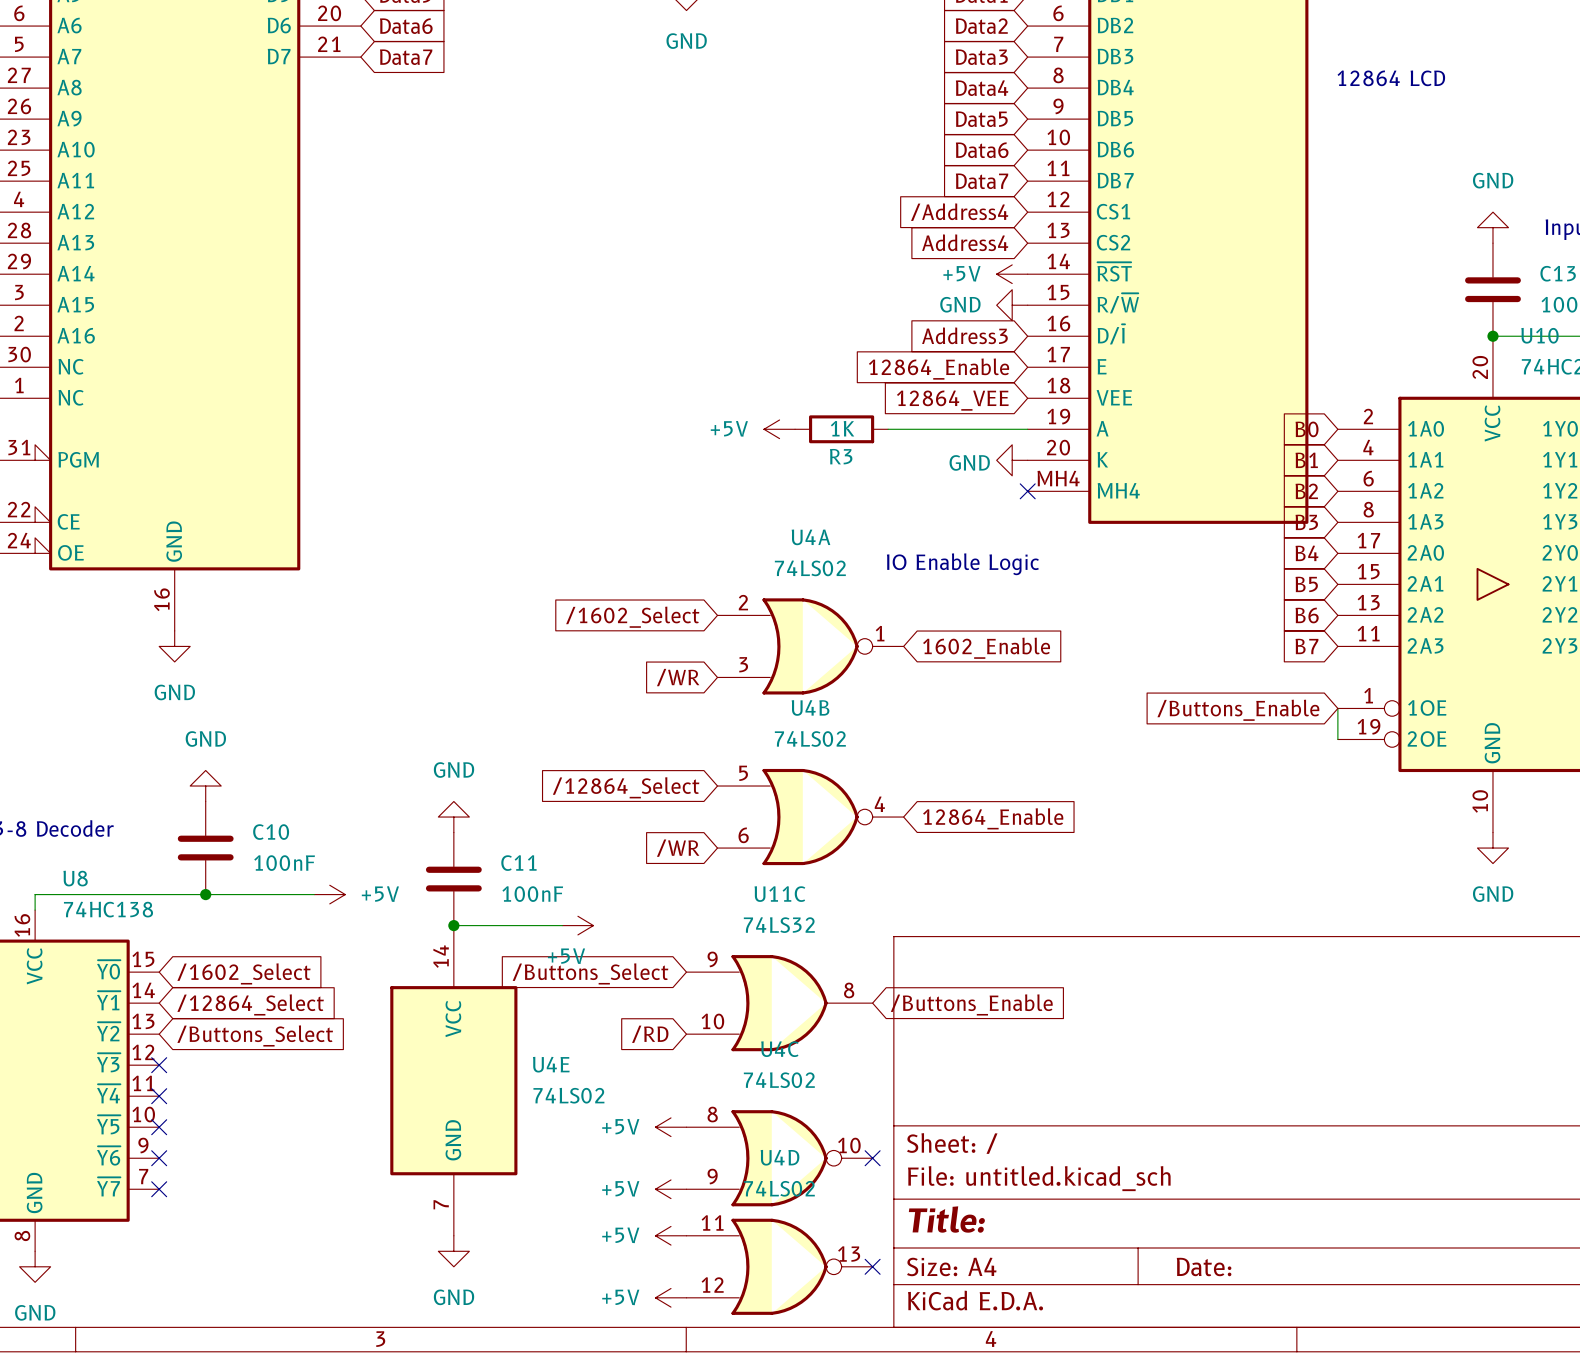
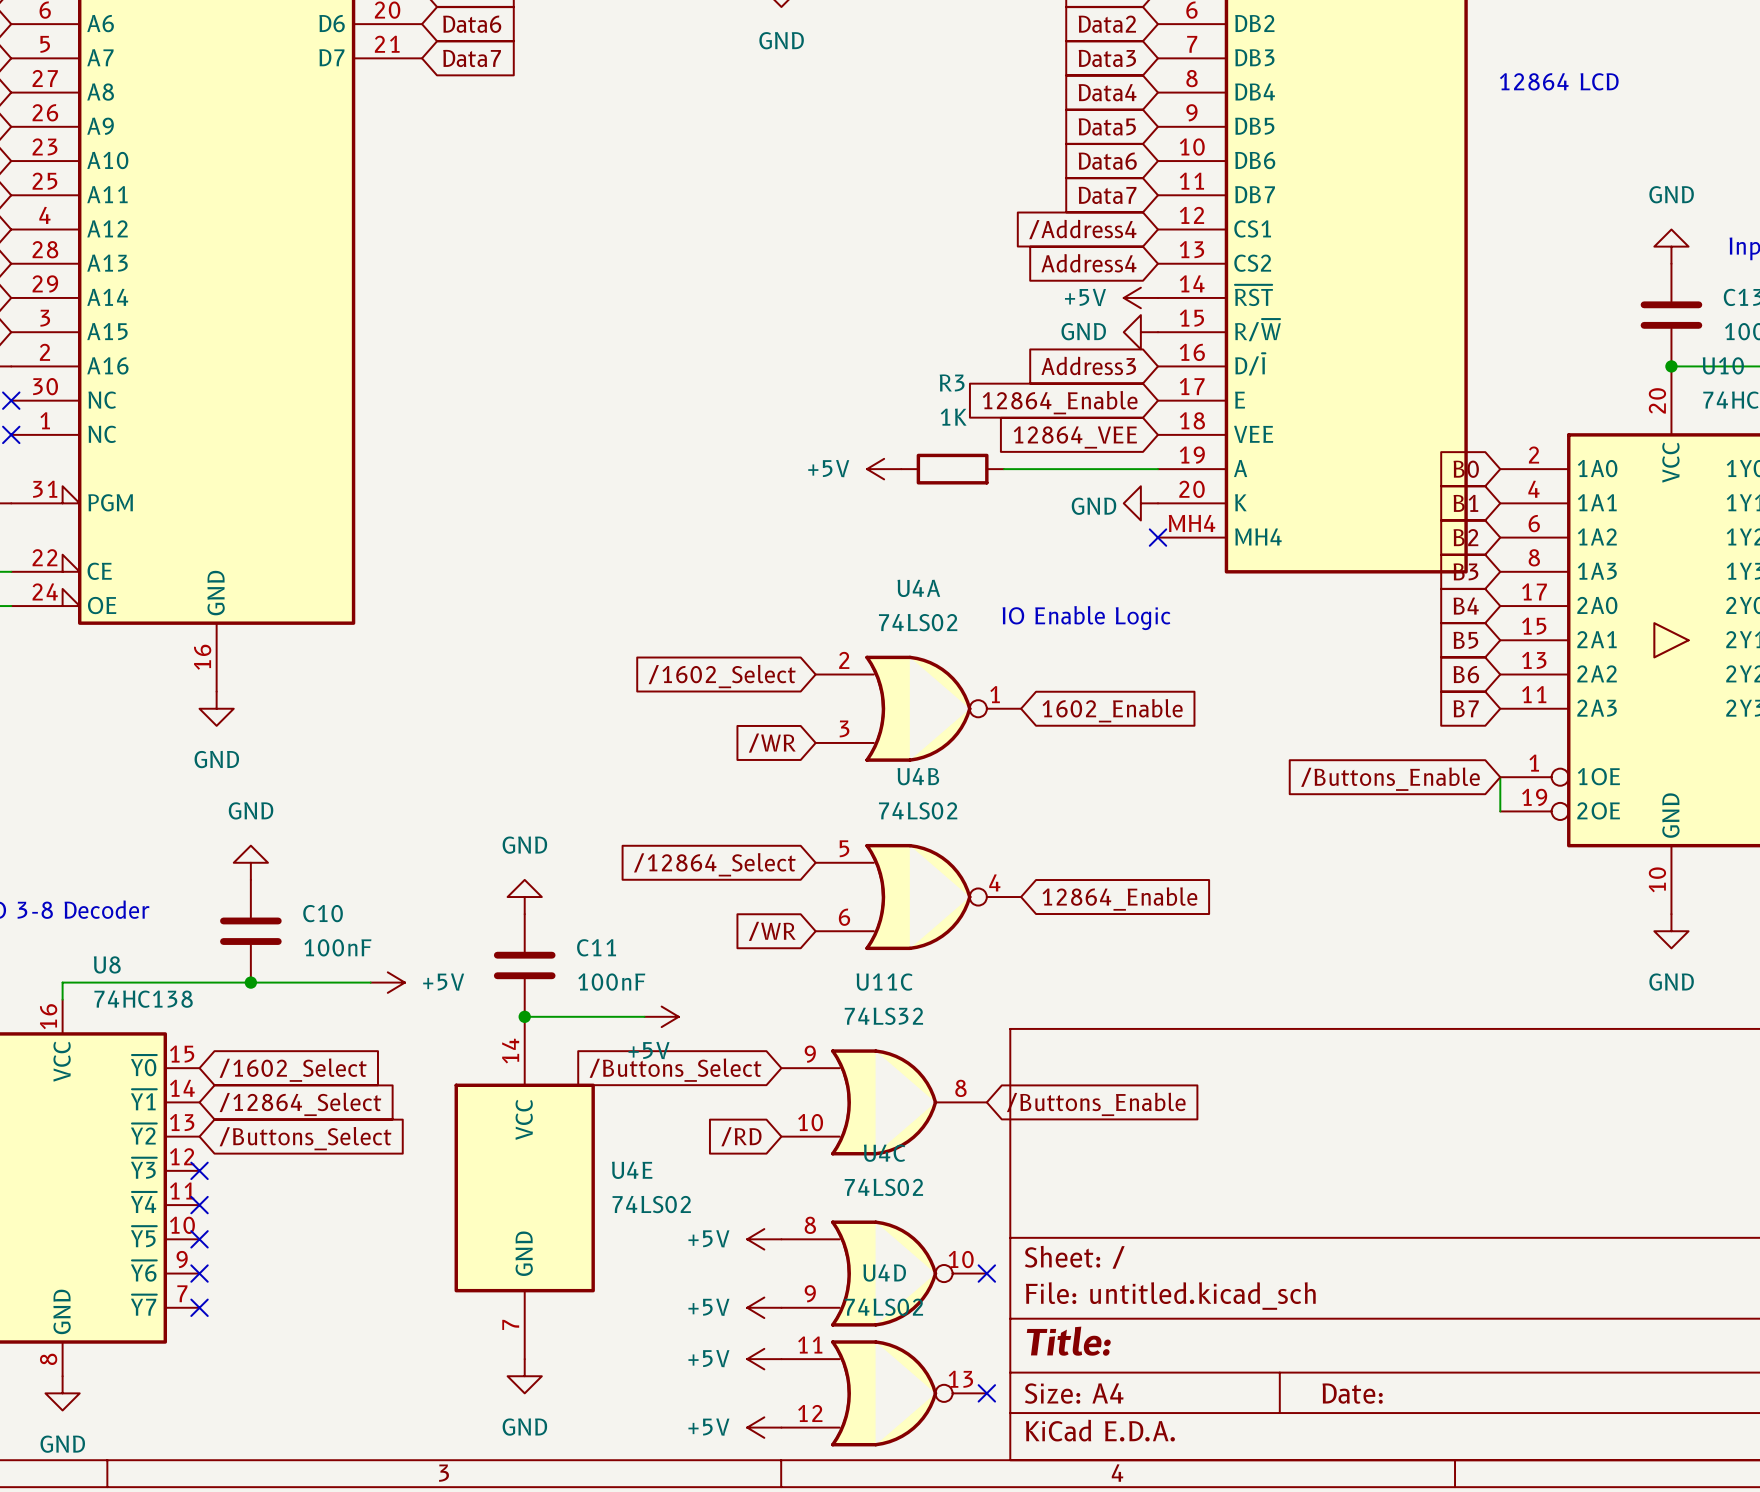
R3 value position: 1K (842, 428) -> 1K (953, 417)
R3 name position: R3 (841, 456) -> R3 (952, 382)

